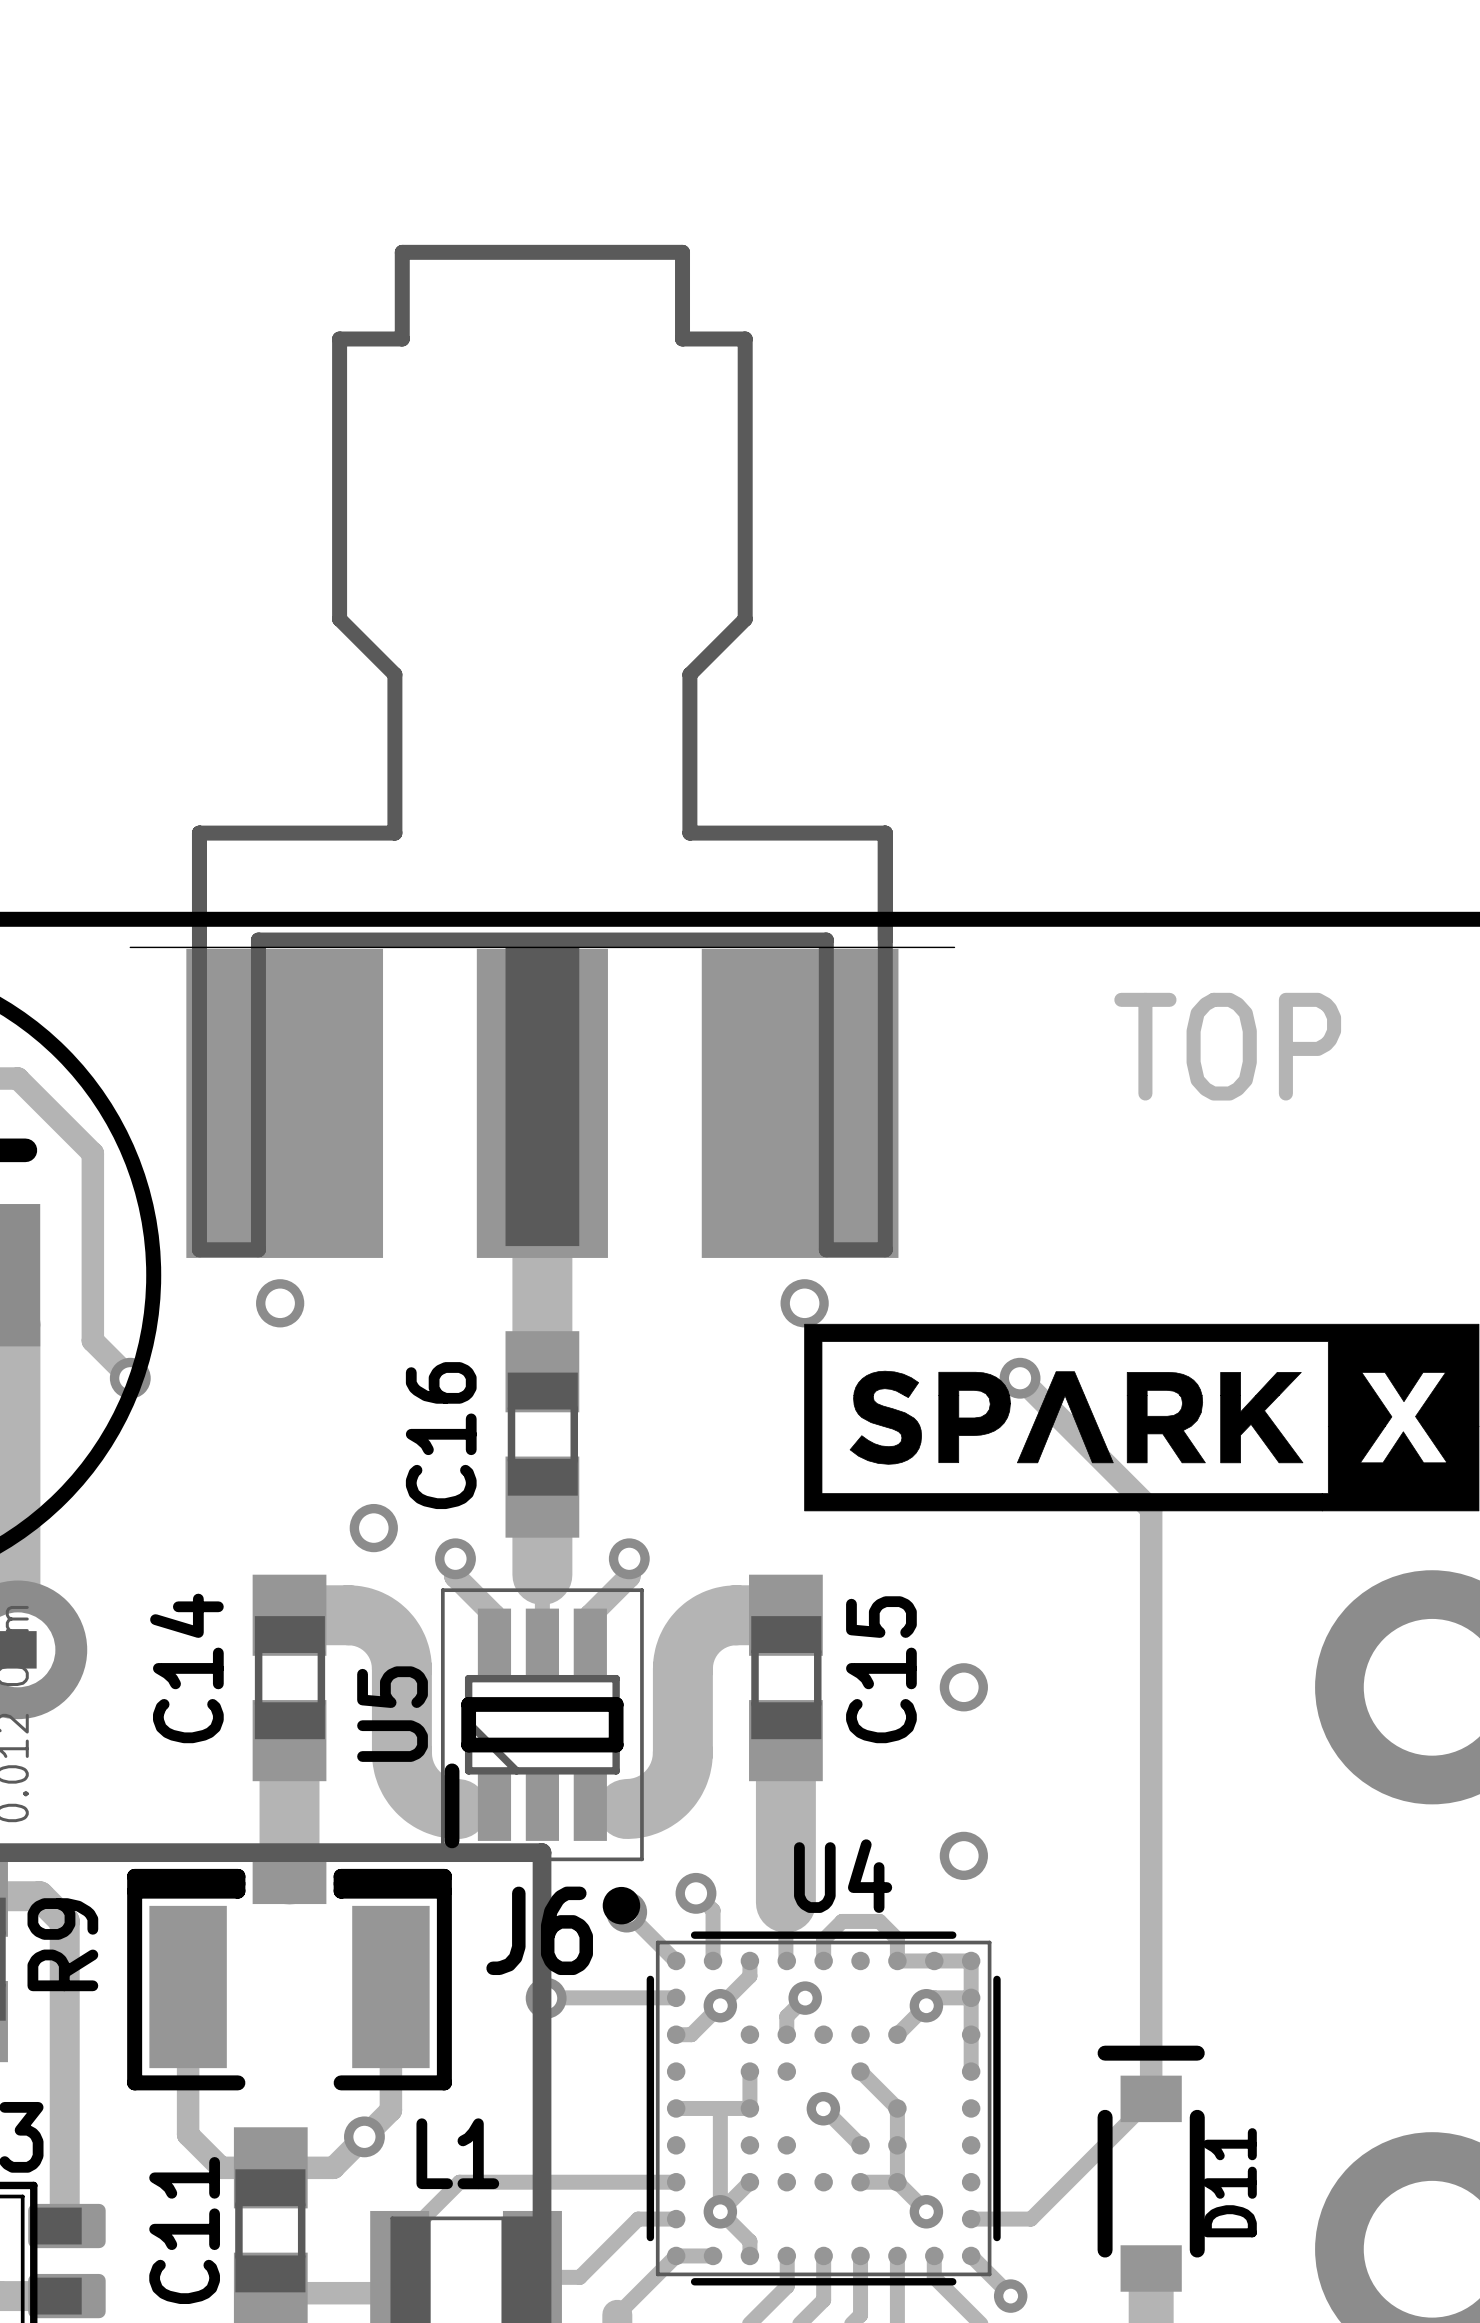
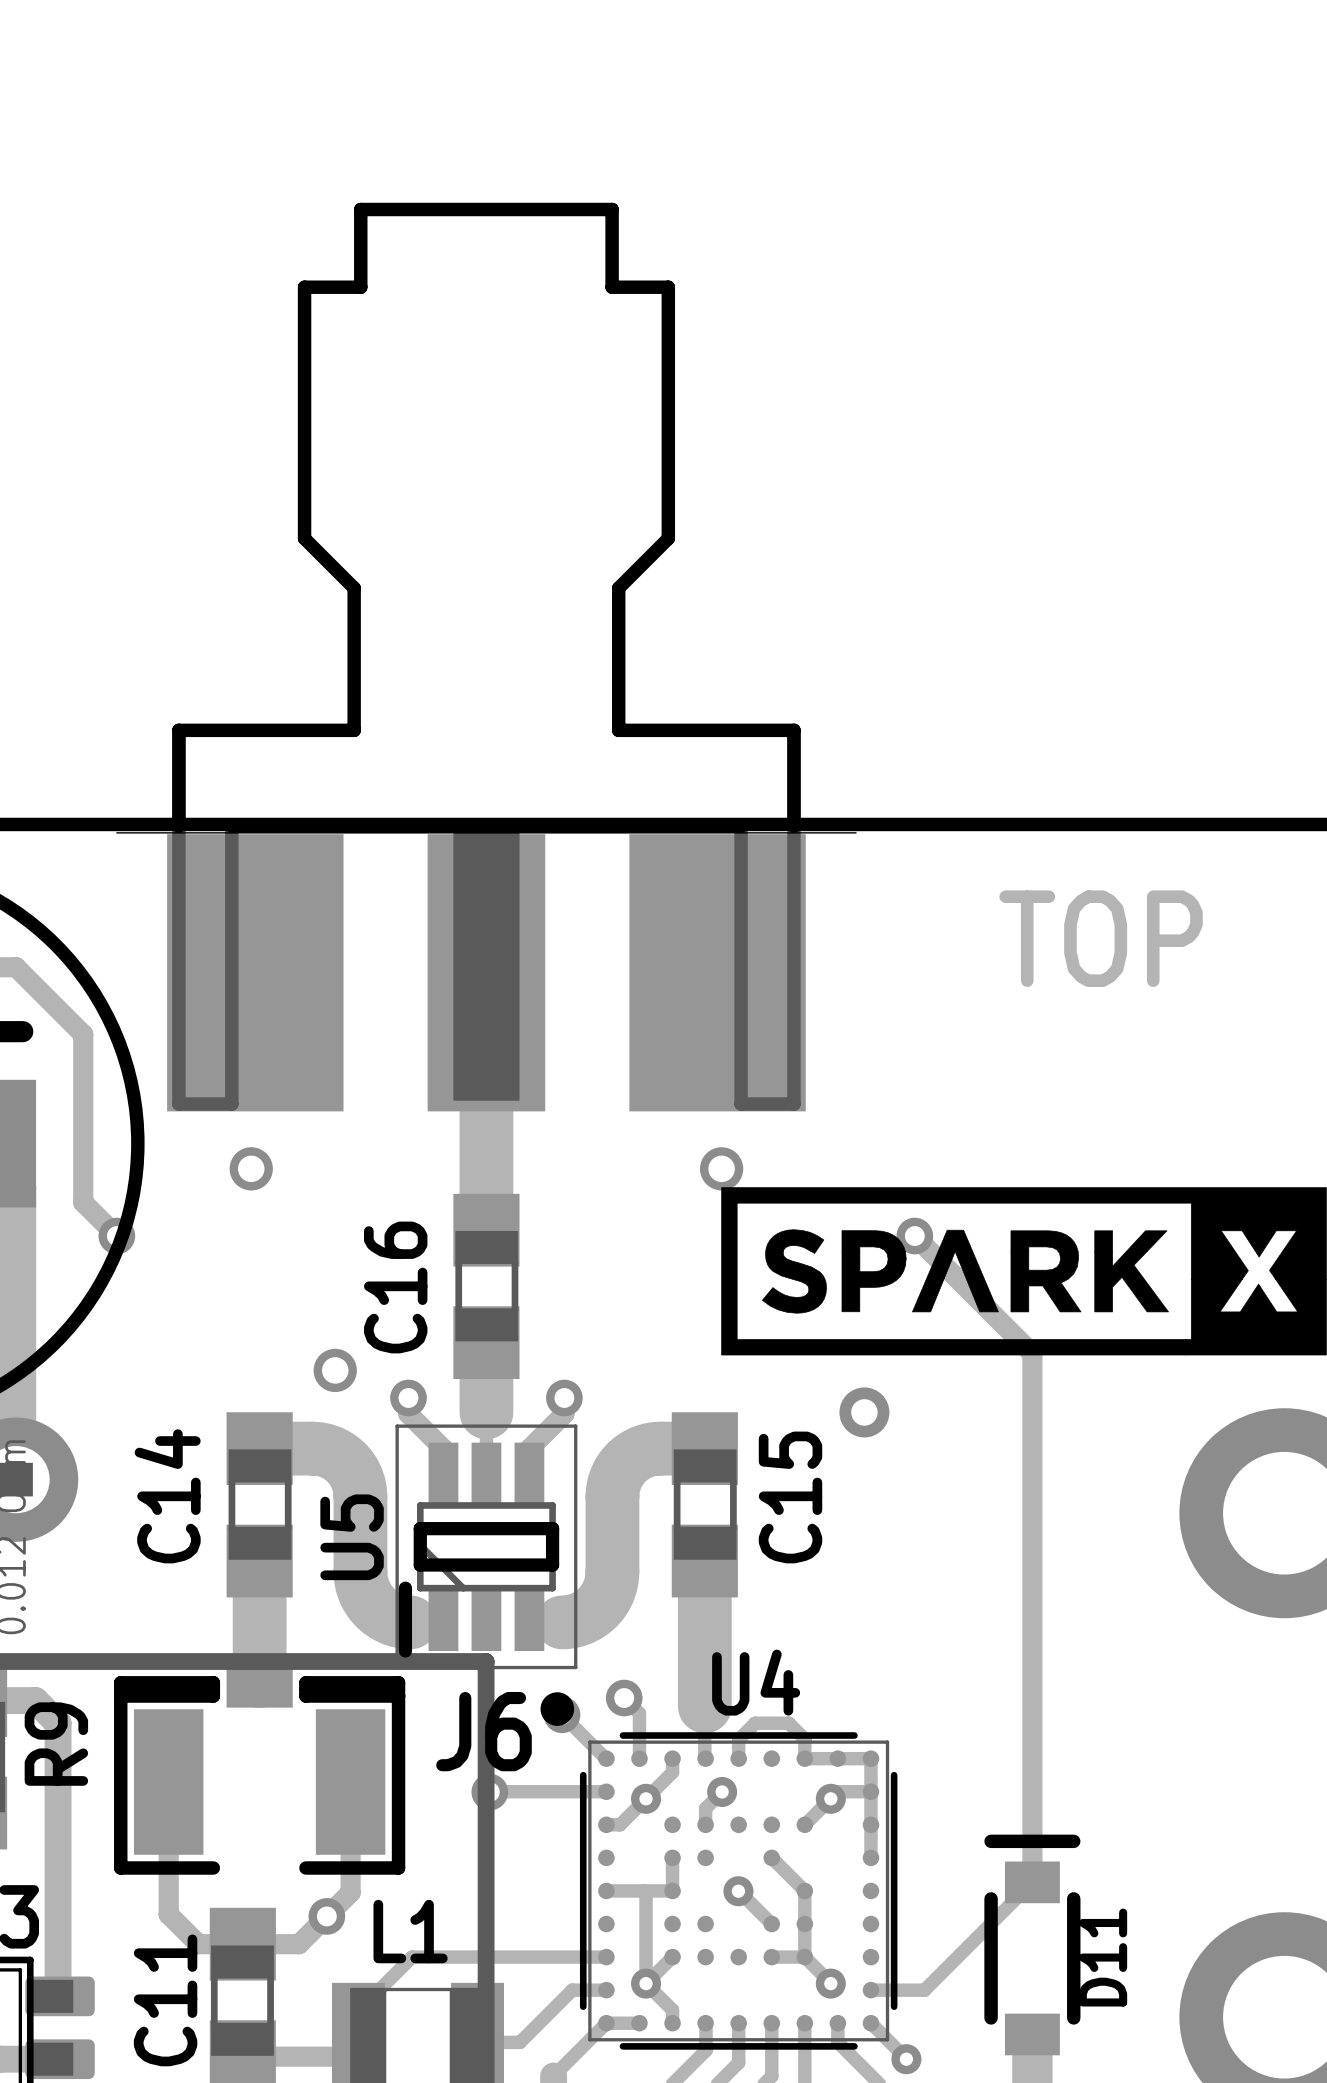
part footprint: [130, 244, 955, 1258] -> [116, 202, 857, 1112]
via: none -> (864, 1412)
via: (963, 1687) -> none
via: (963, 1855) -> none

